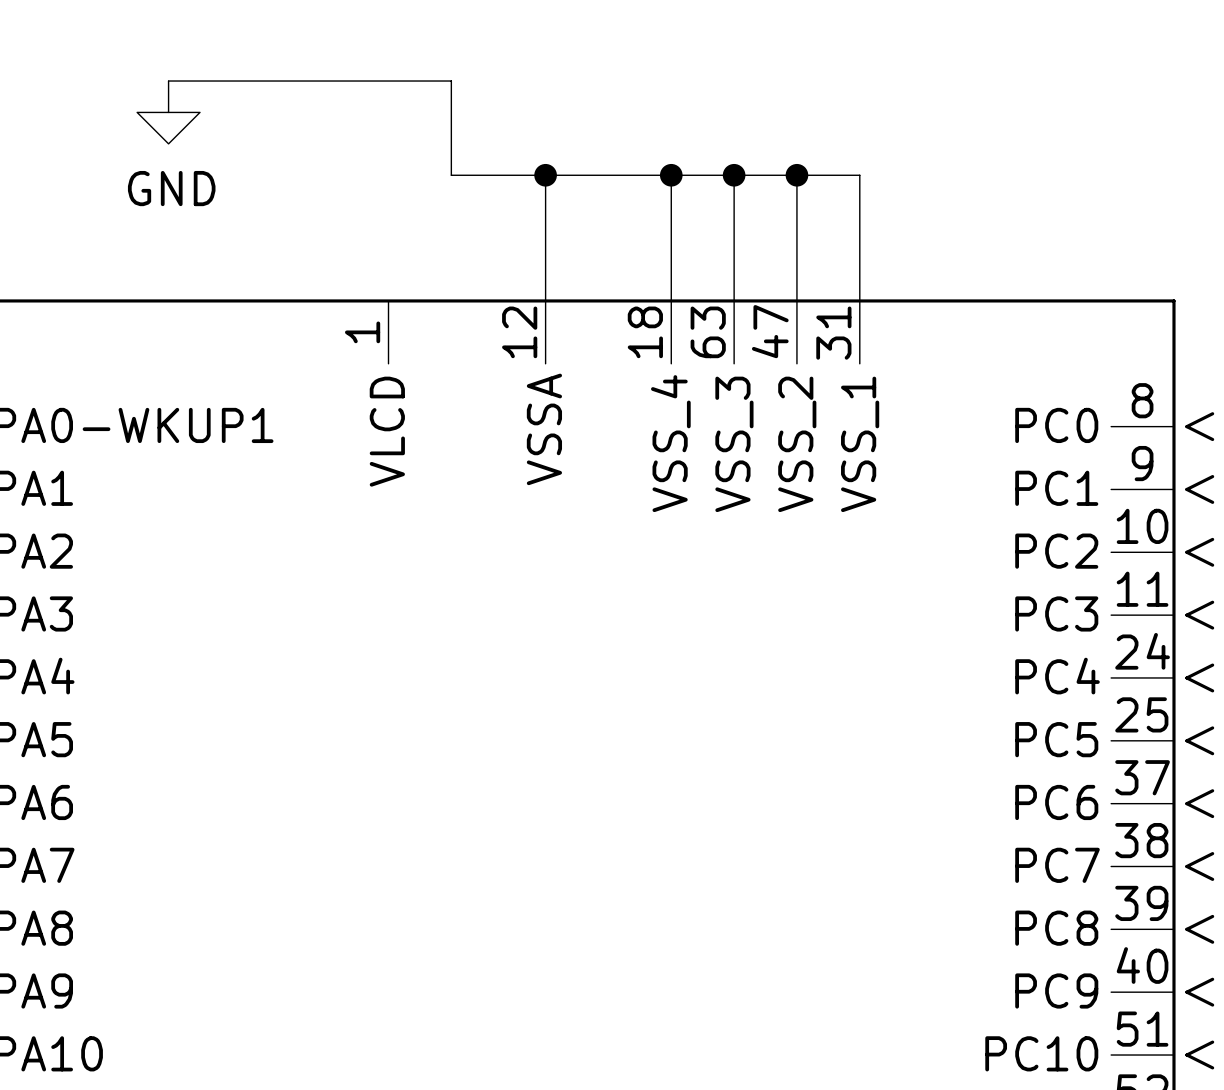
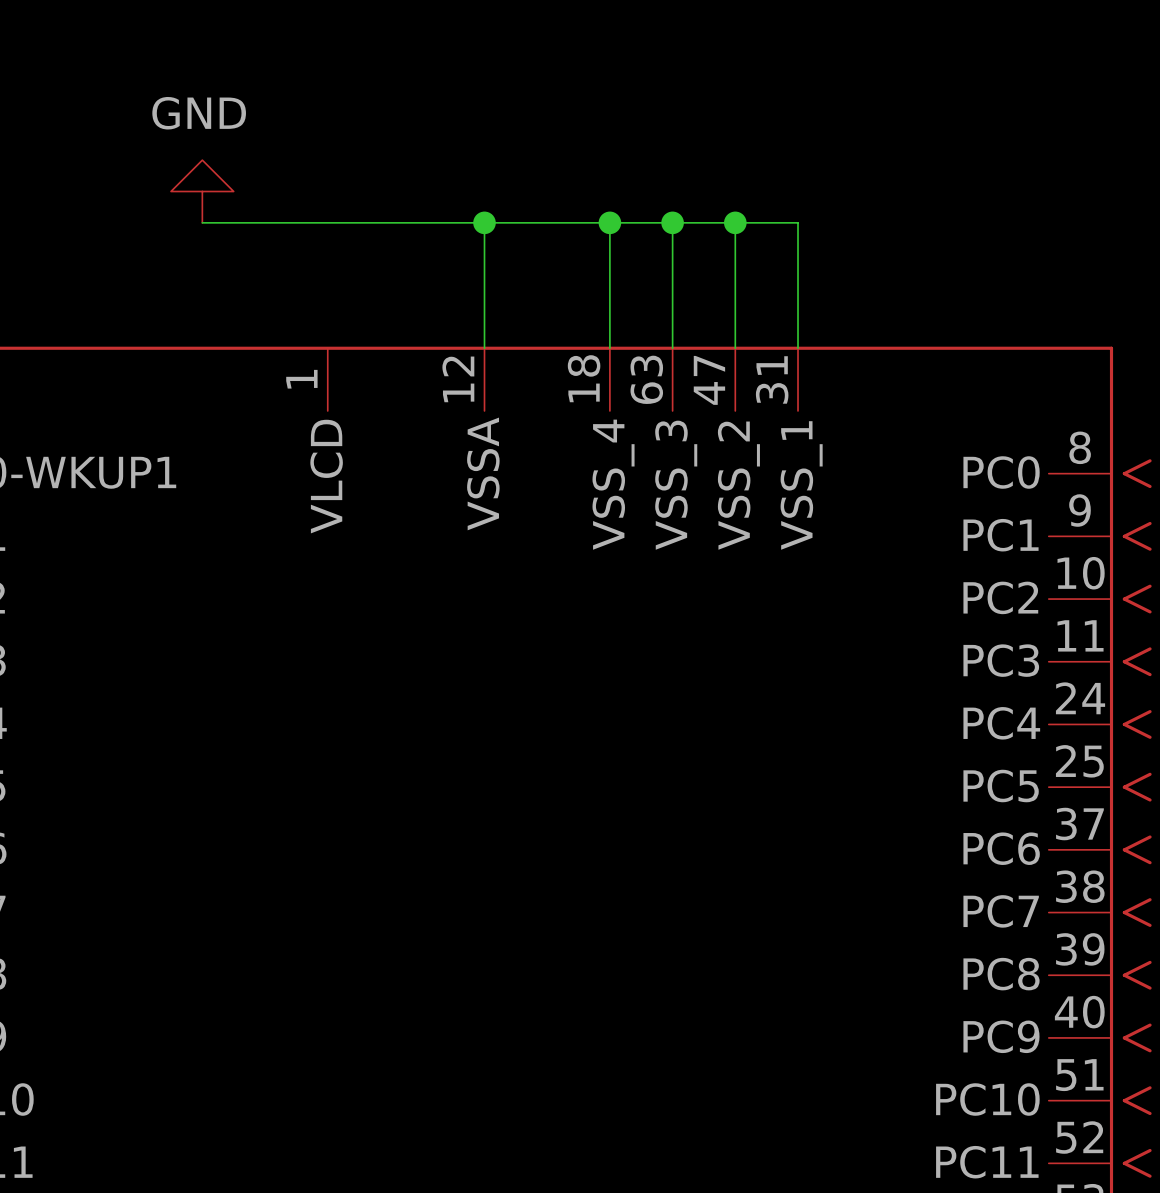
wire: (168, 81) (451, 81) (451, 175) -> (202, 222) (390, 222)
power symbol rotation: 0° (168, 112) -> 180° (202, 191)
power symbol position: GND (168, 112) -> GND (202, 191)

